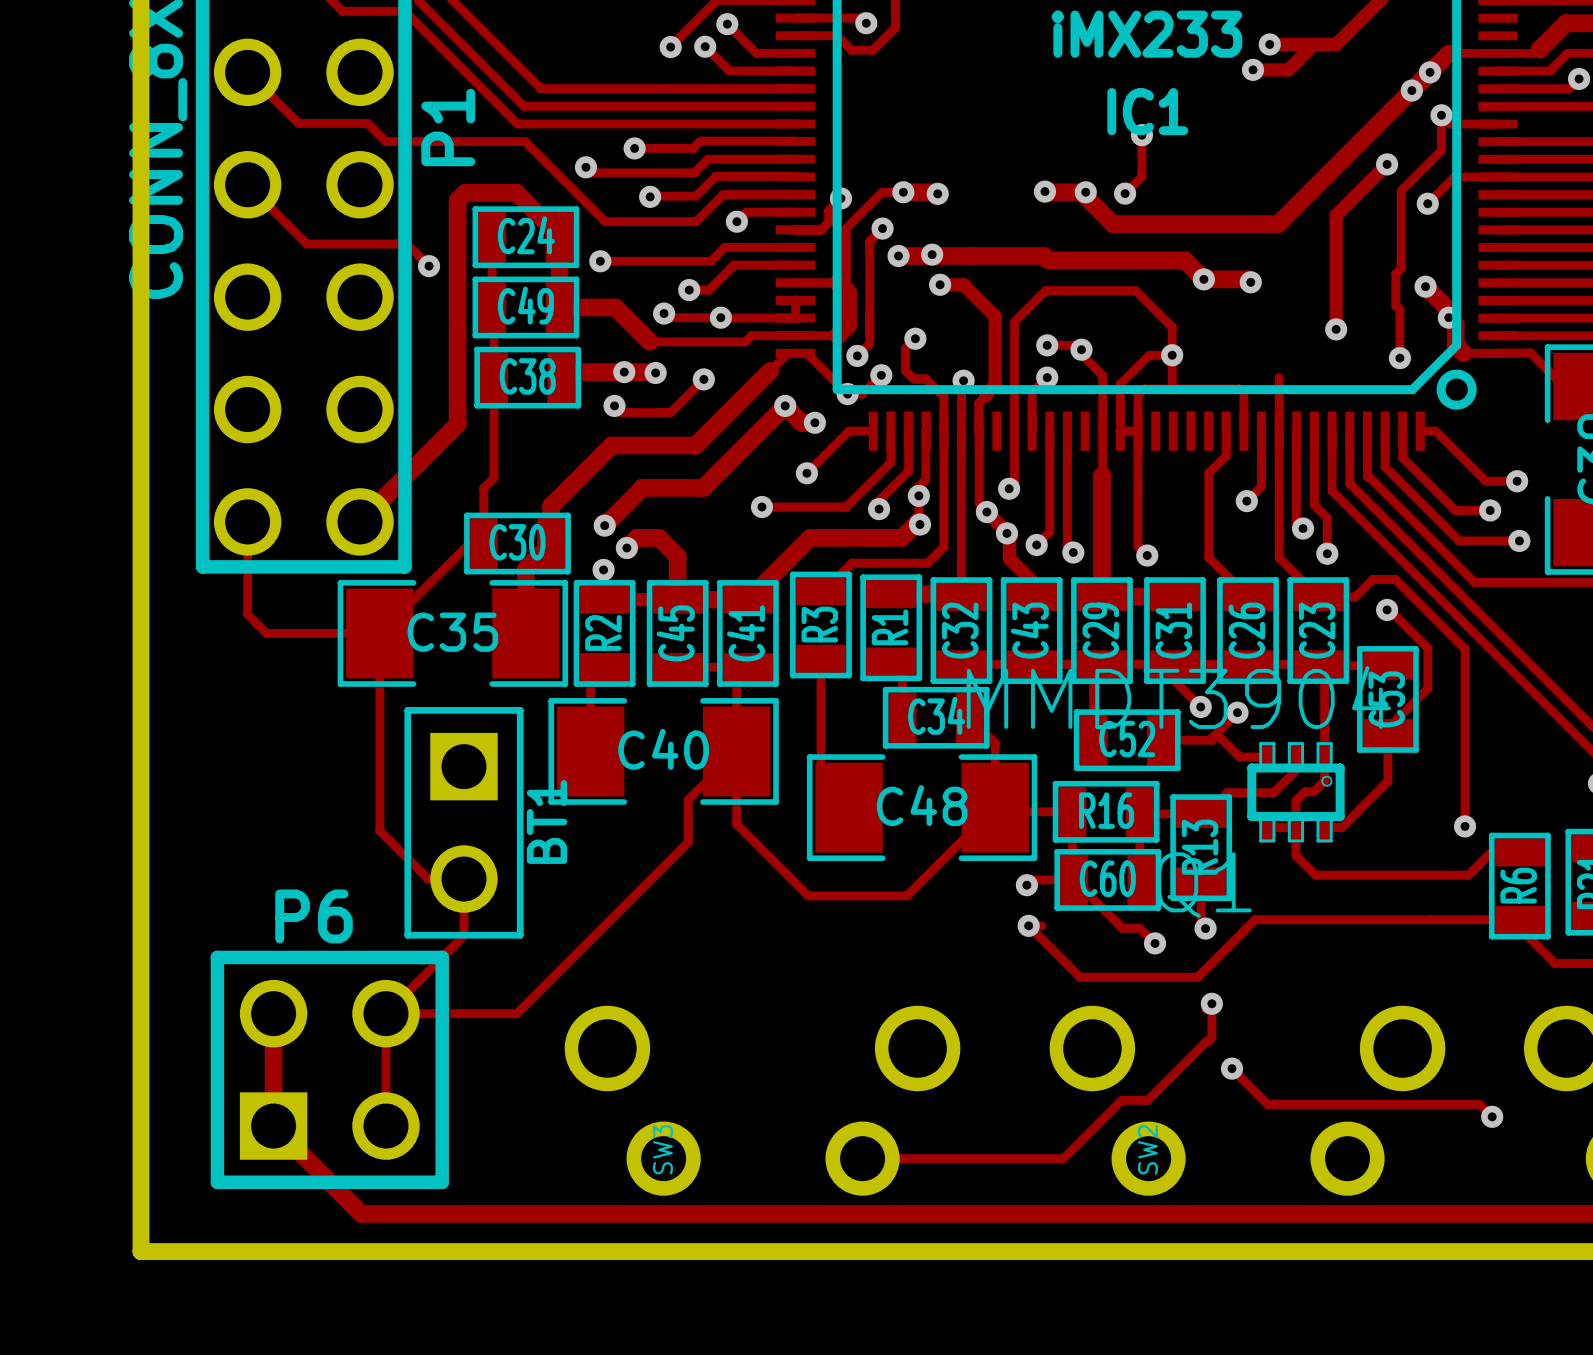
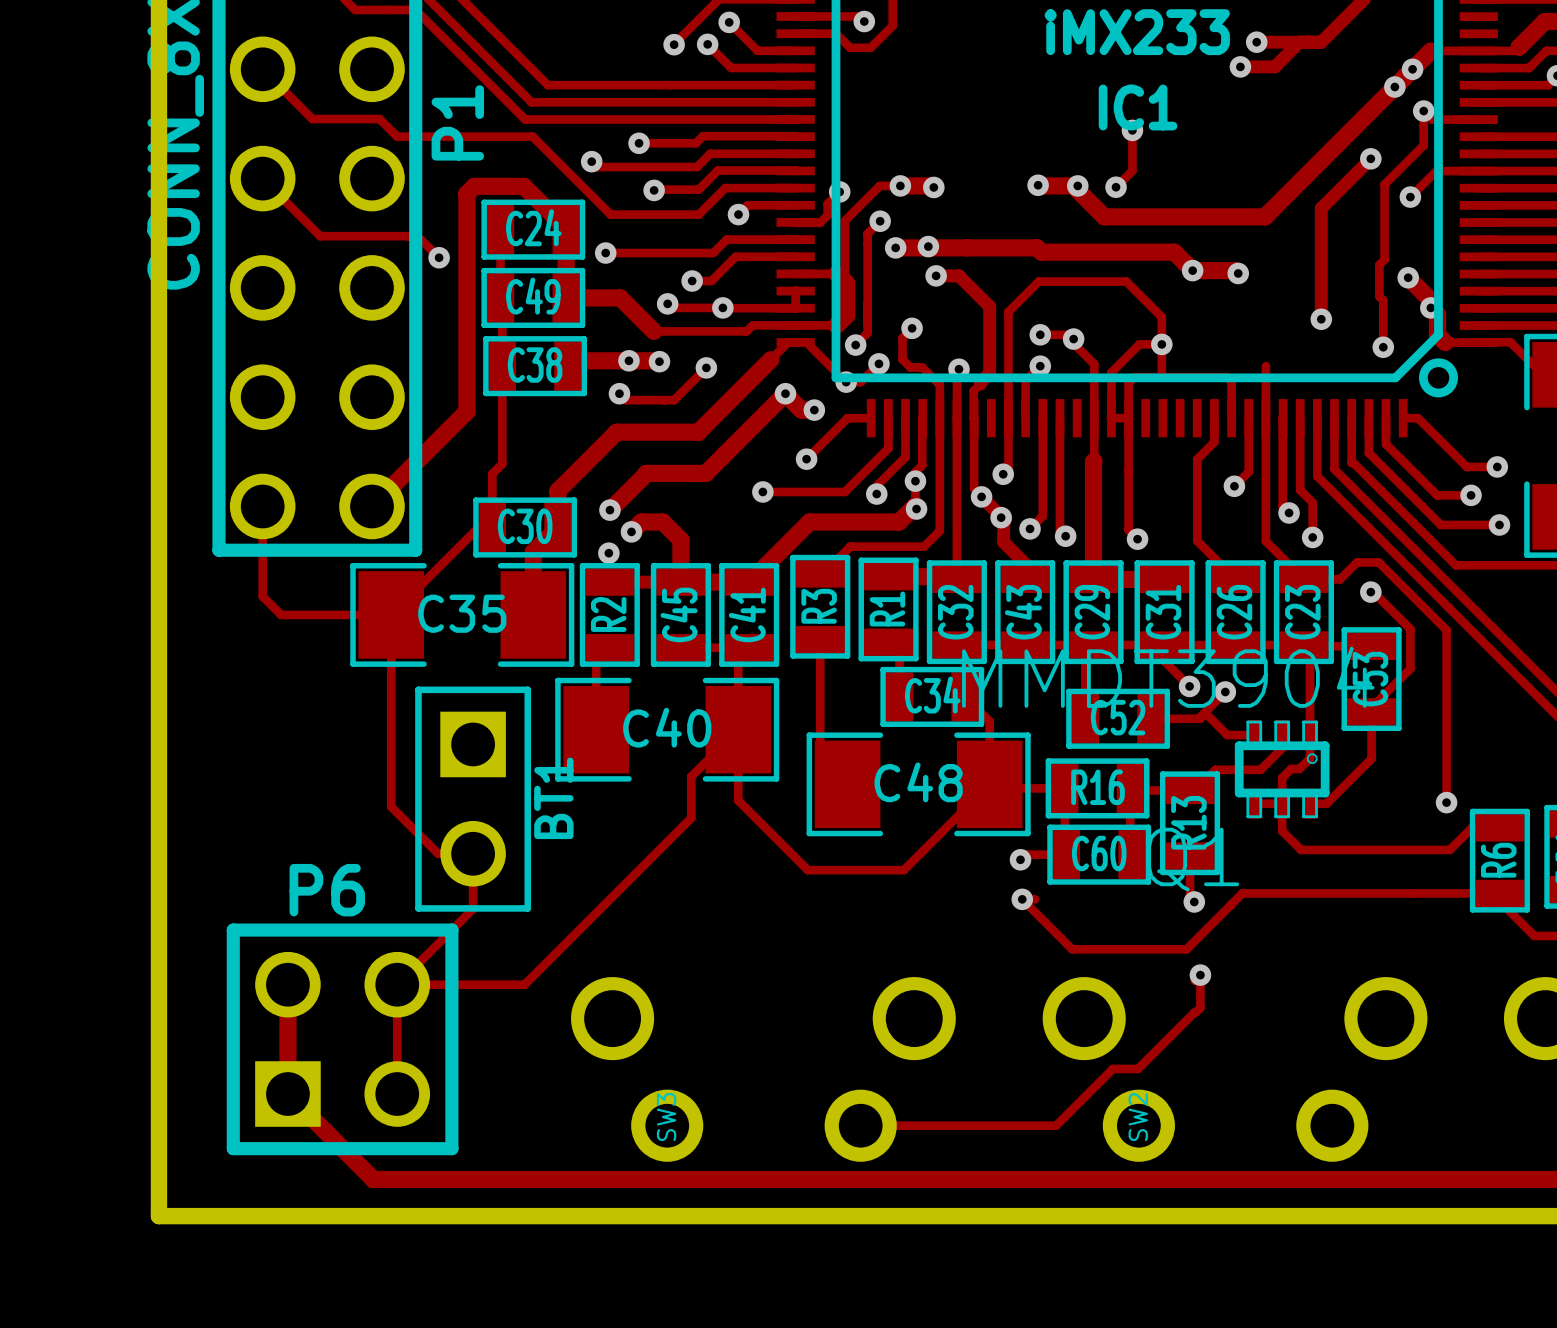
track: (1074, 879) (1122, 928) (1139, 928) (1155, 943) -> none
via: (1155, 943) -> none
track: (1232, 1068) (1267, 1104) (1479, 1104) (1492, 1116) -> none
via: (1232, 1068) -> none
via: (1492, 1116) -> none

